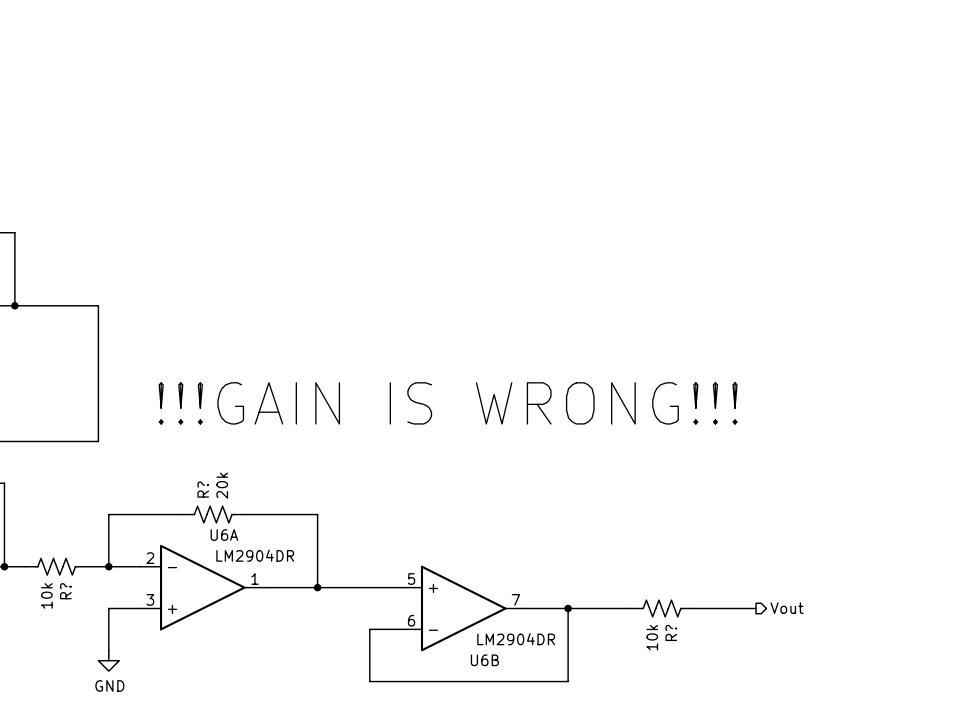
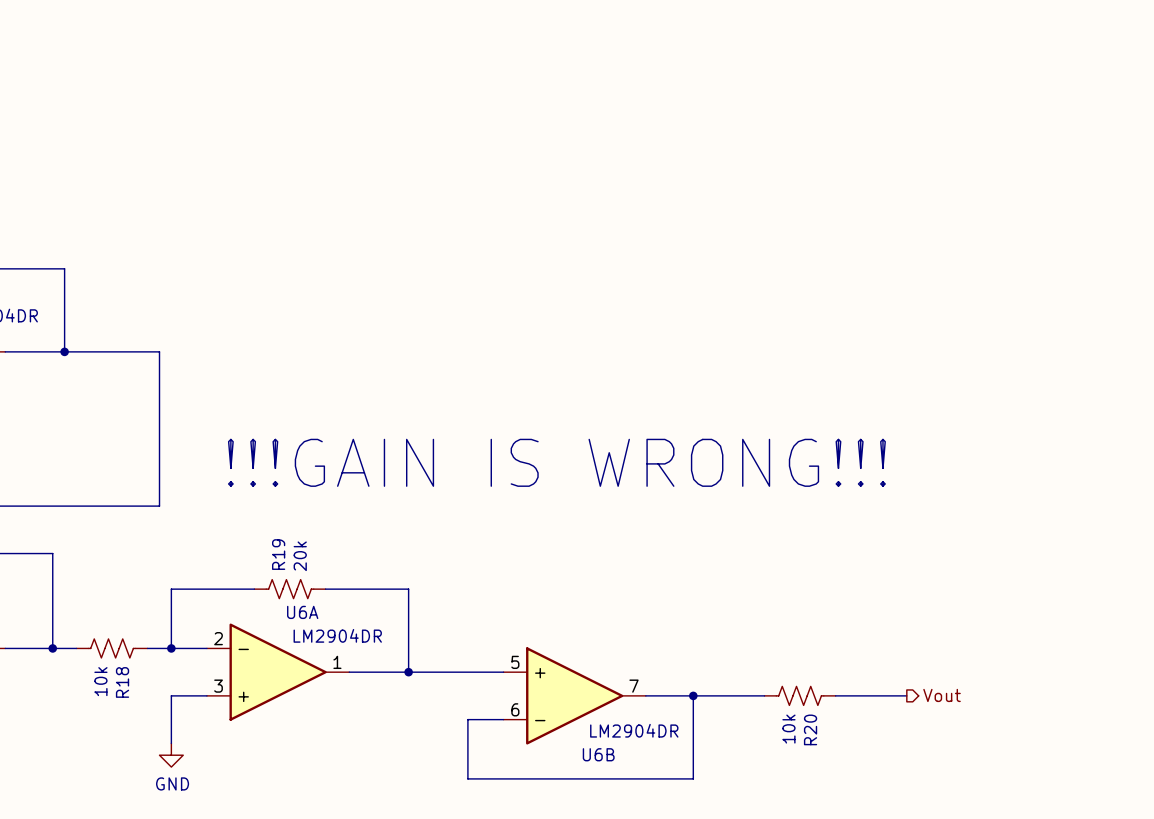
R? name: R? (203, 489) -> R19 (278, 554)
R? name: R? (65, 591) -> R18 (122, 682)
R? name: R? (671, 632) -> R20 (810, 729)

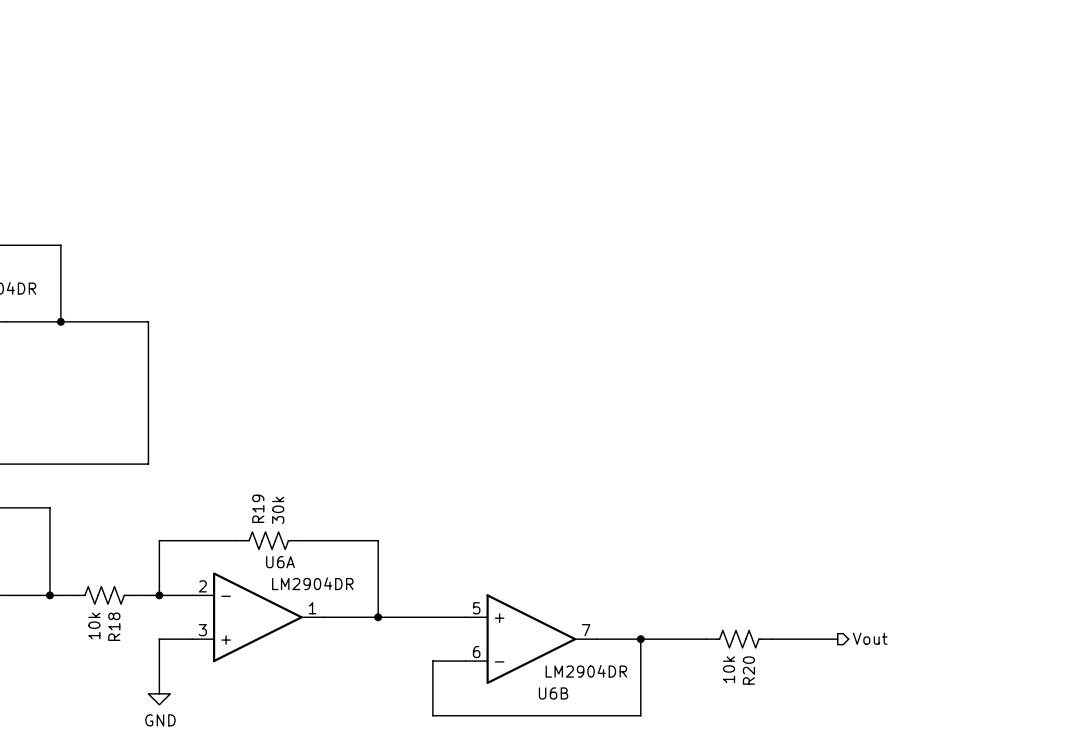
text: !!!GAIN IS WRONG!!! (556, 462) -> none
R19 value: 20k (300, 556) -> 30k (278, 510)

